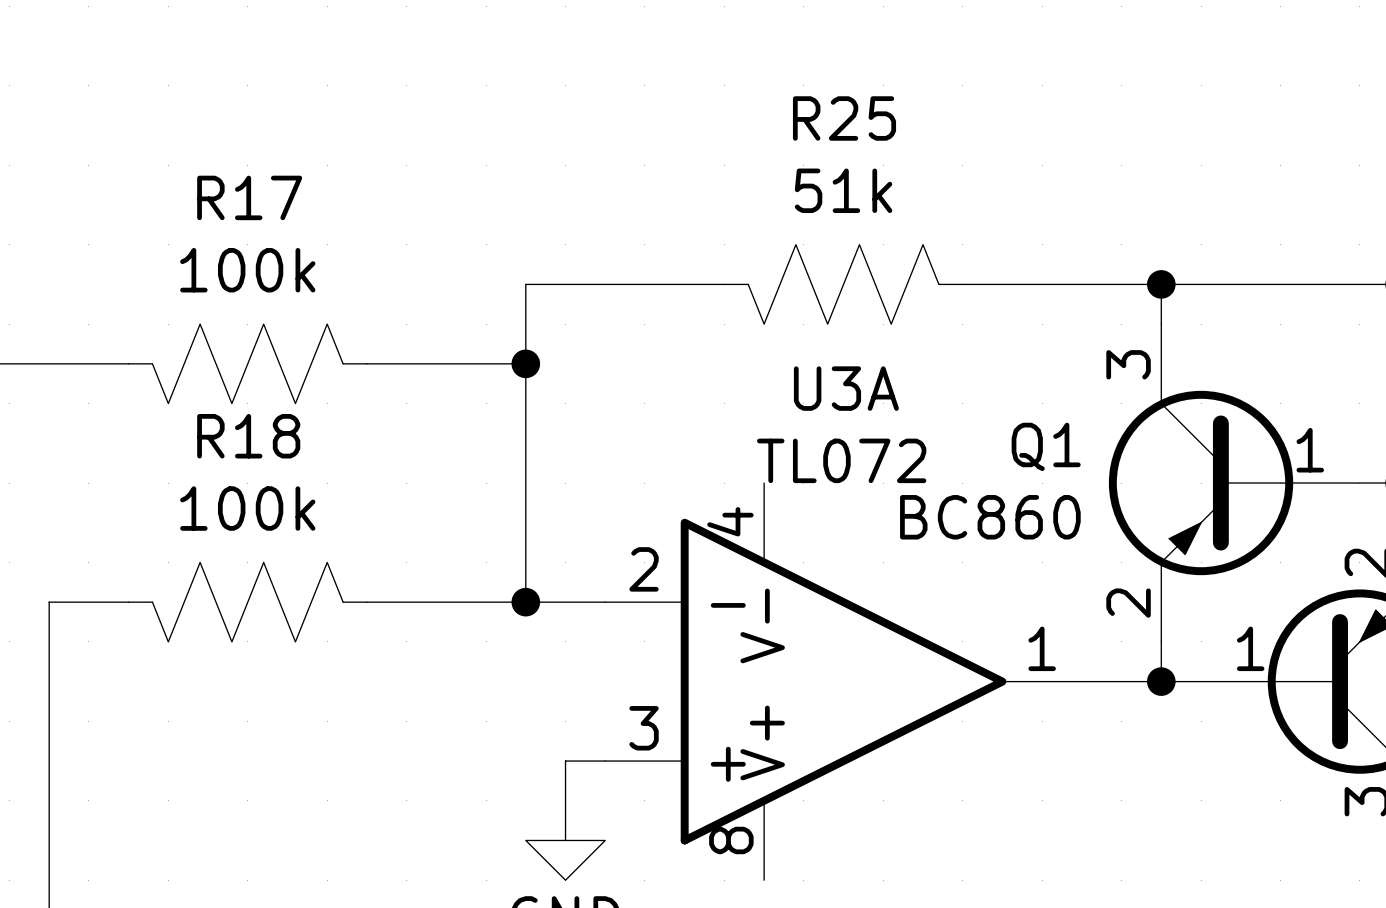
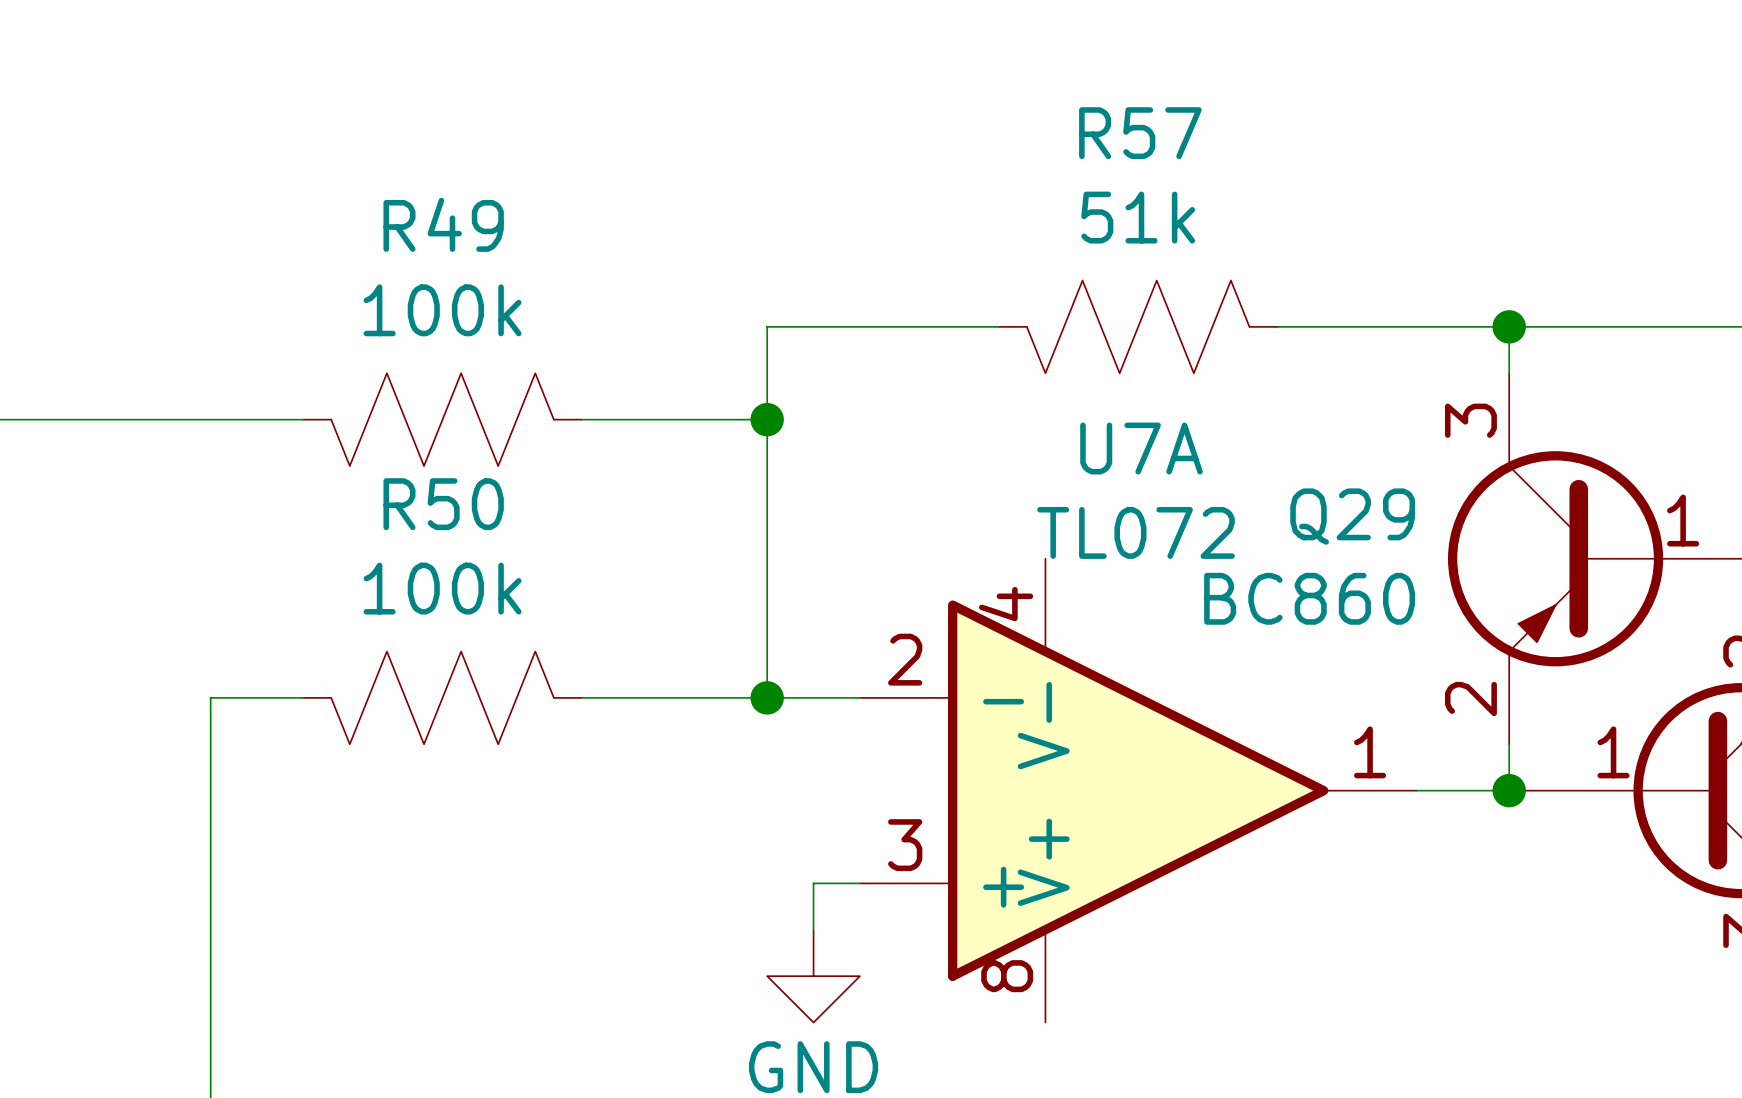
R25 name: R25 (844, 118) -> R57 (1140, 133)
R17 name: R17 (249, 197) -> R49 (443, 224)
U3A name: U3A (846, 388) -> U7A (1141, 448)
R18 name: R18 (248, 436) -> R50 (443, 504)
Q1 name: Q1 (1046, 446) -> Q29 (1352, 516)

